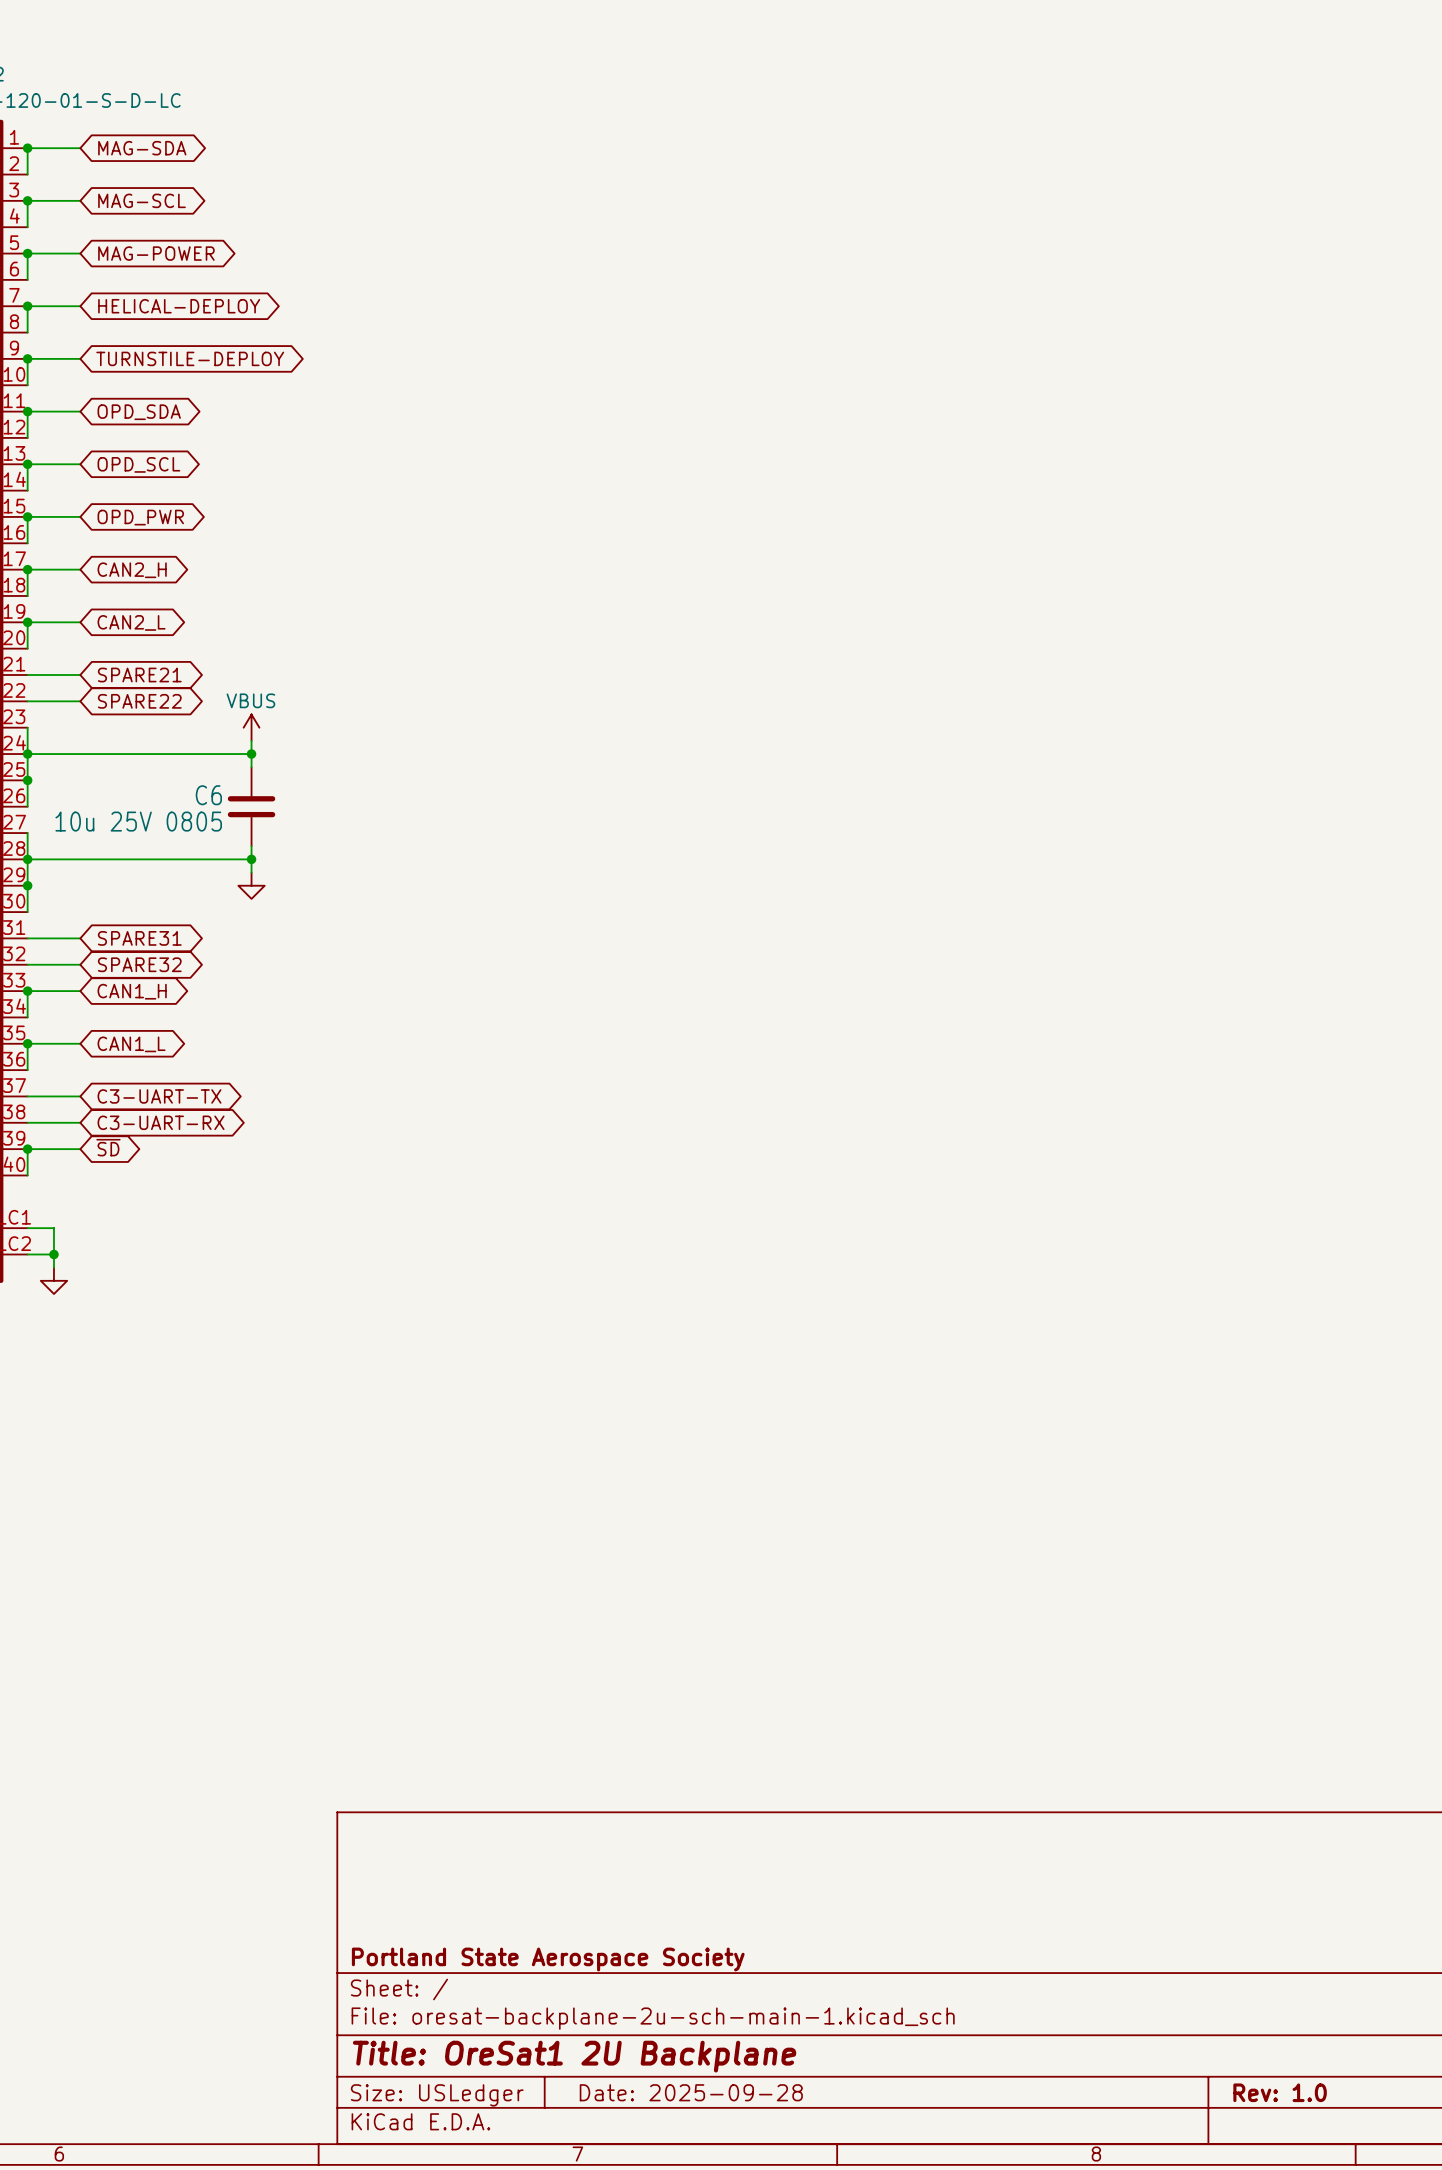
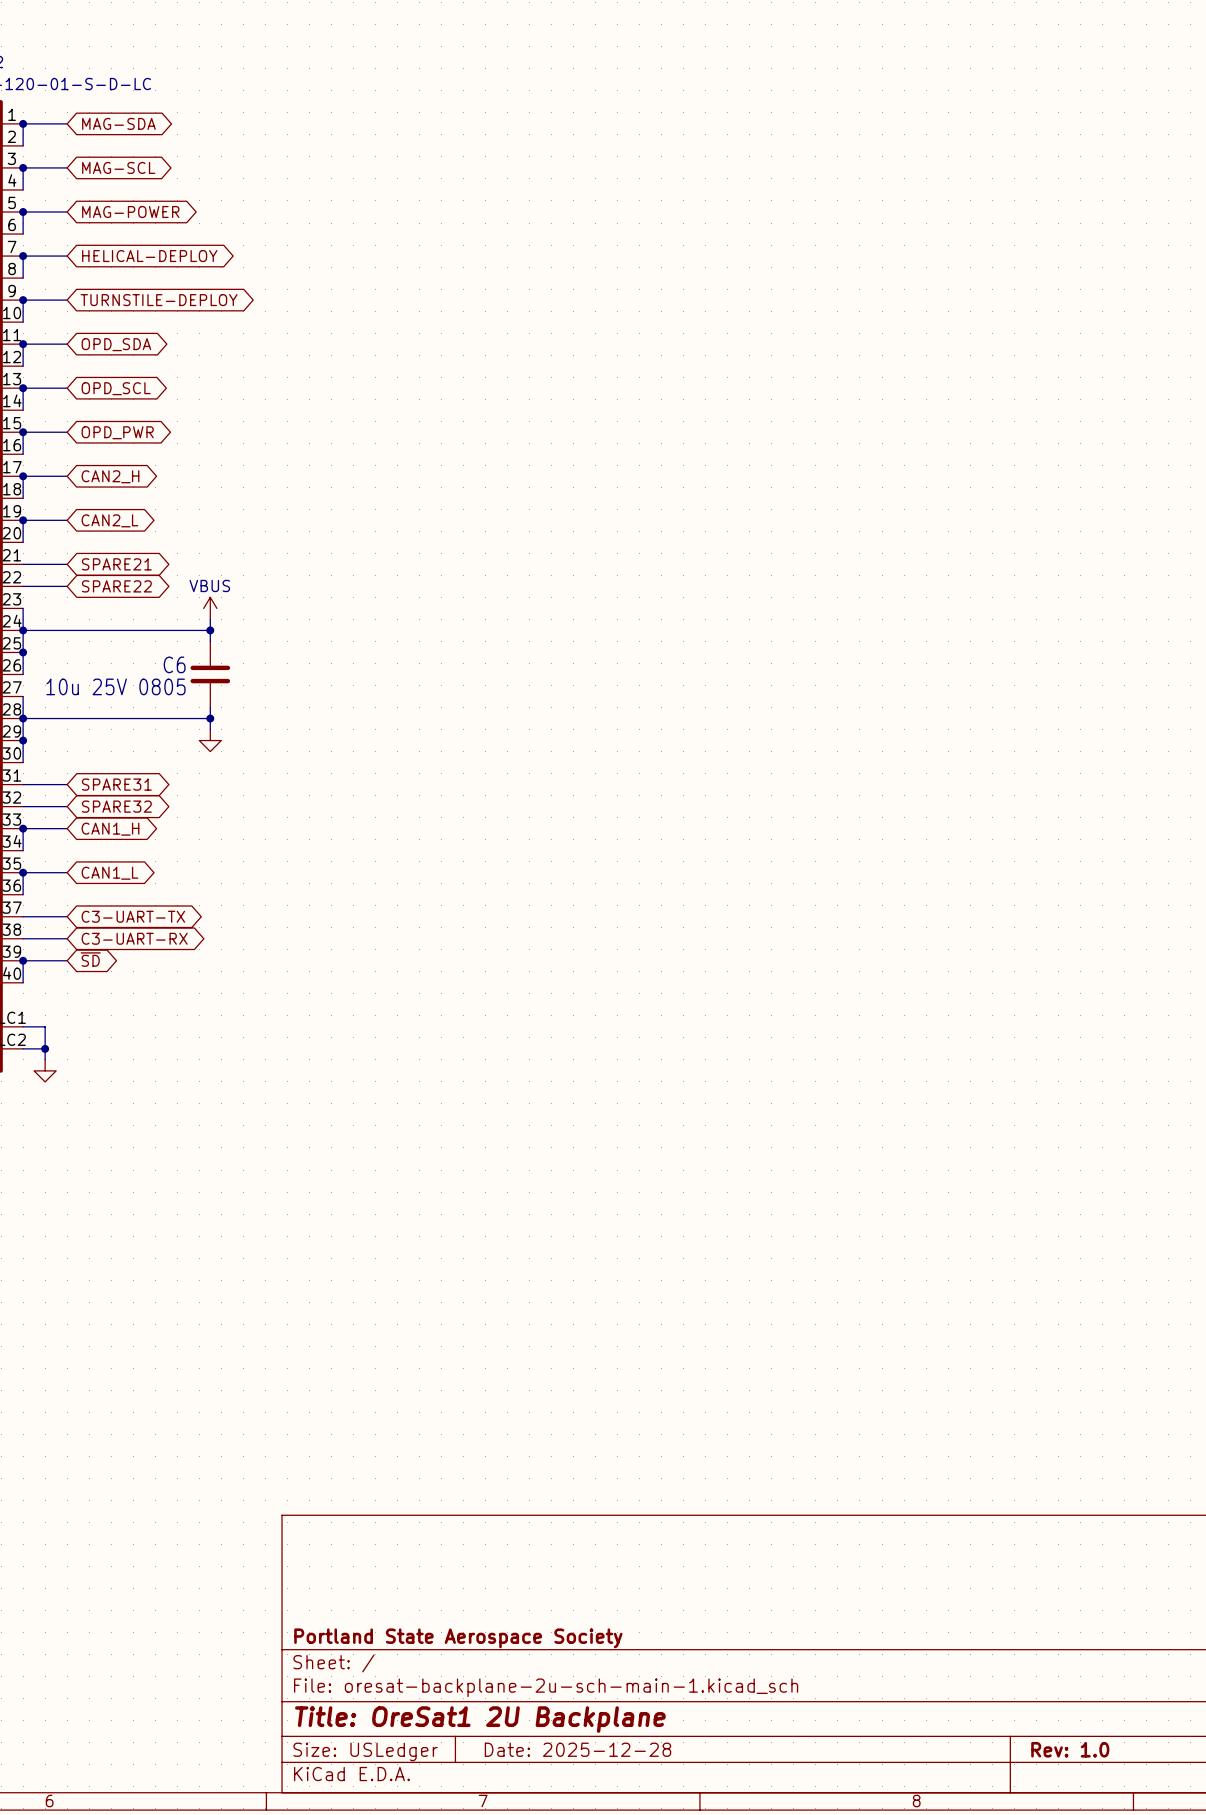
title block: Date: 2025-09-28 (691, 2092) -> Date: 2025-12-28 (577, 1749)

